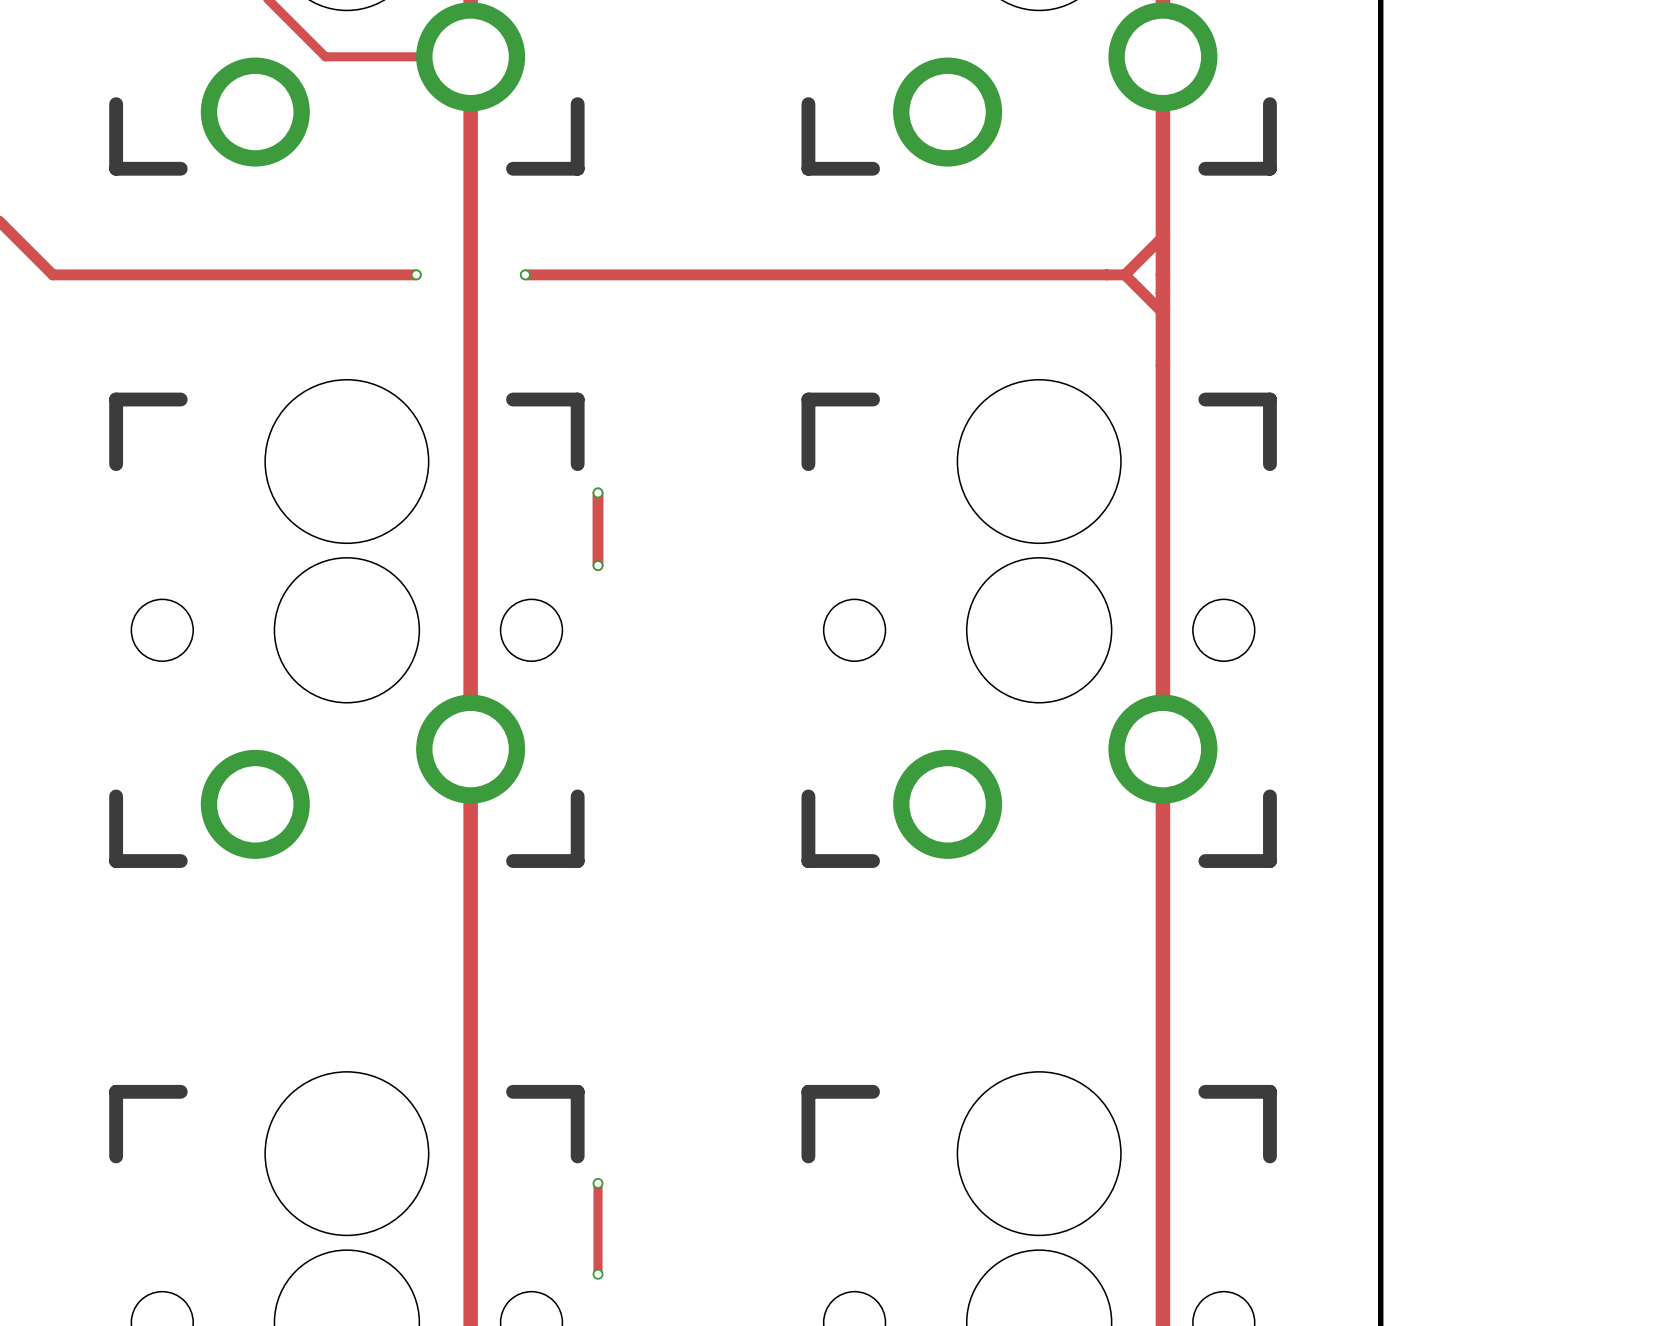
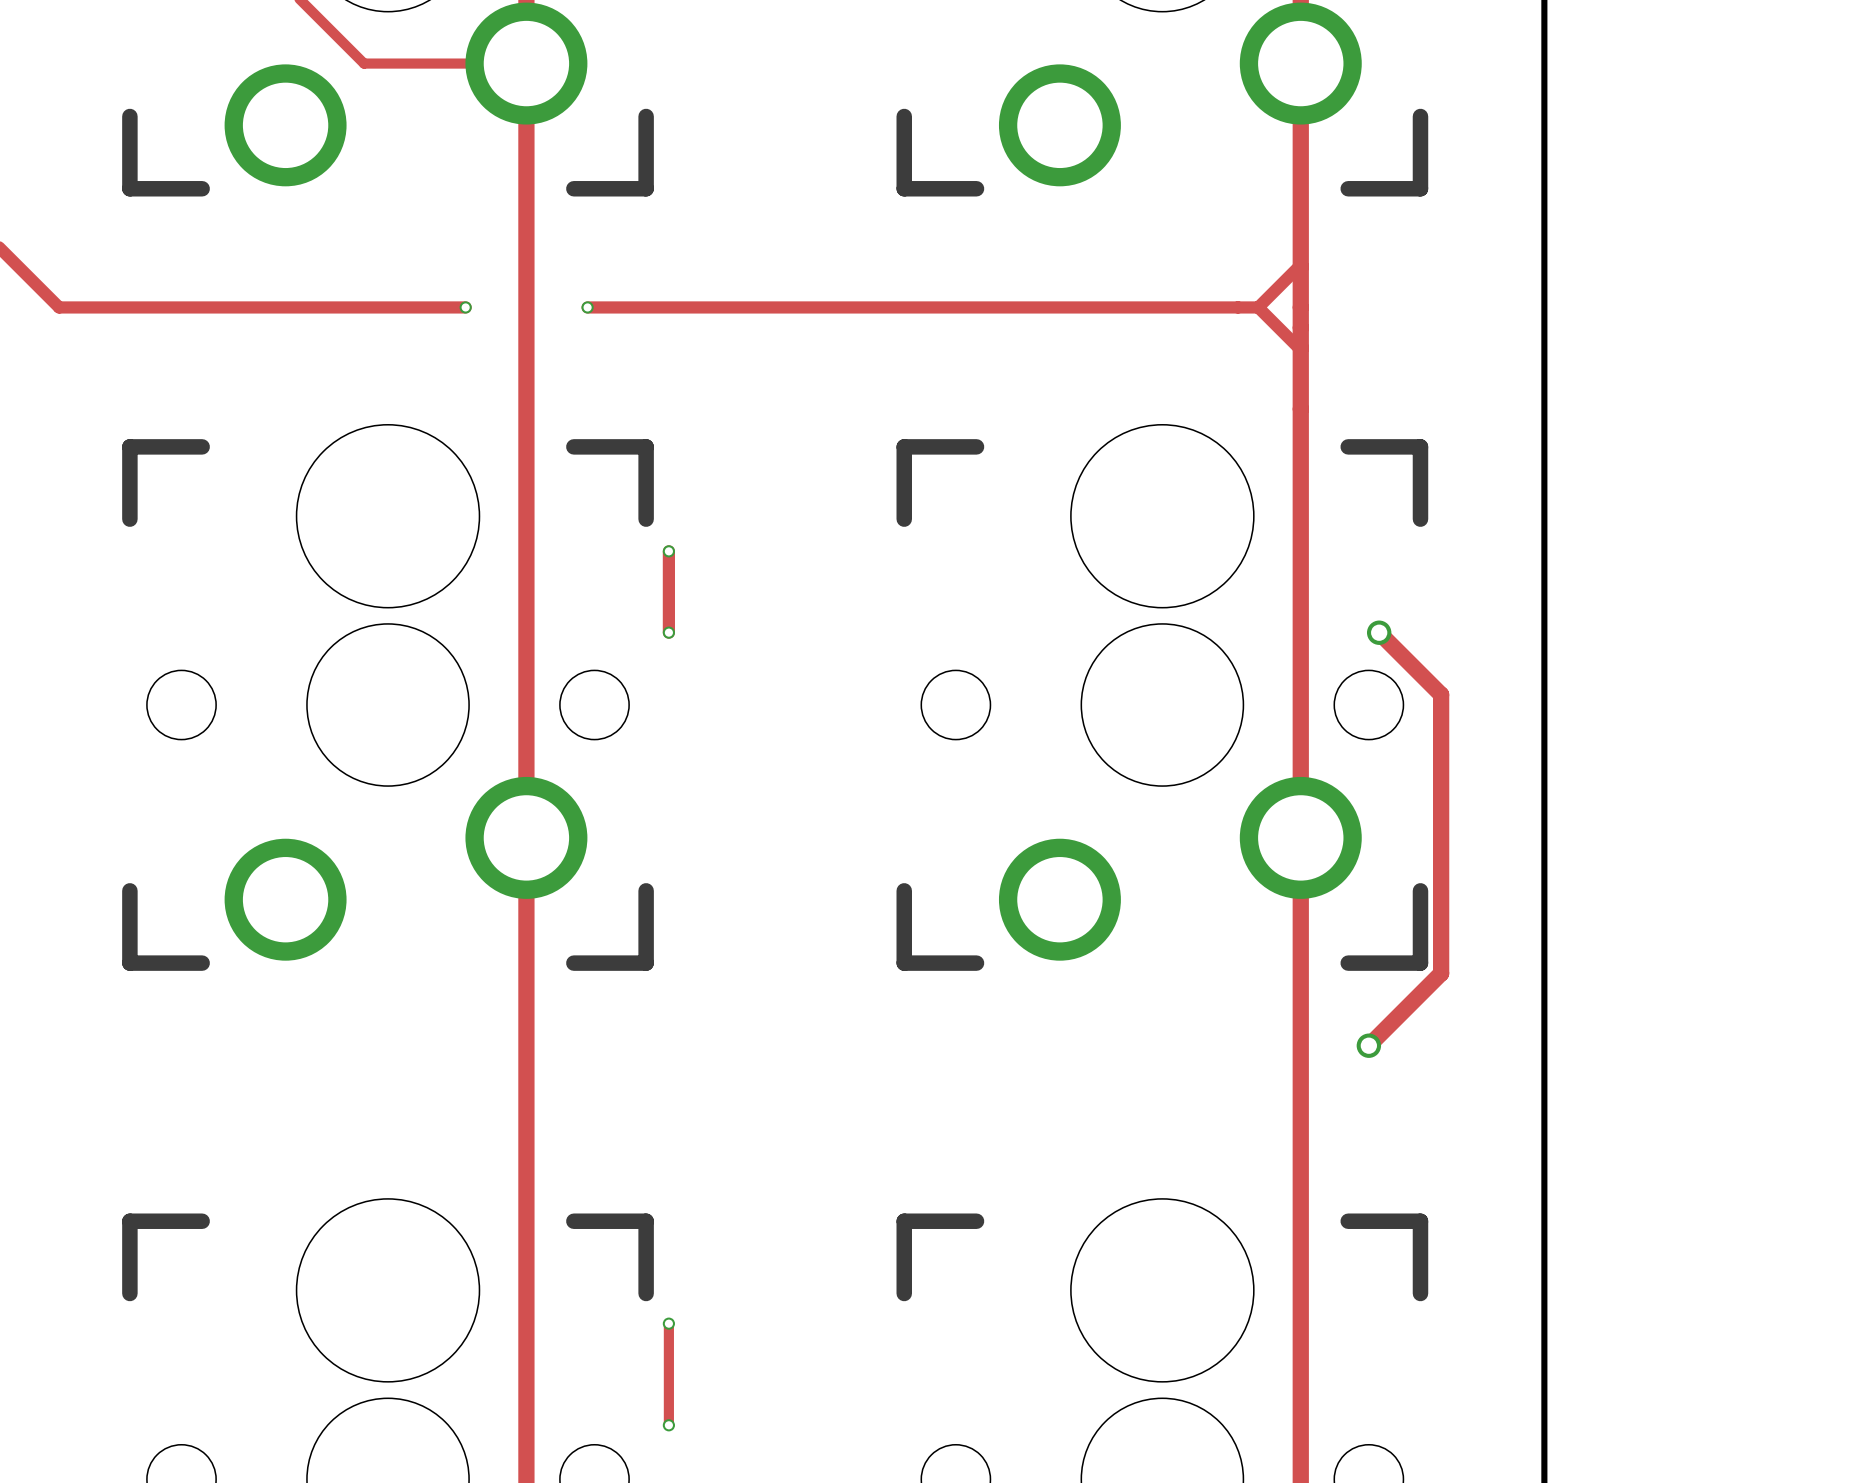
track: none -> (1379, 632) (1441, 694) (1441, 973) (1368, 1045)
via: none -> (1379, 632)
via: none -> (1368, 1045)

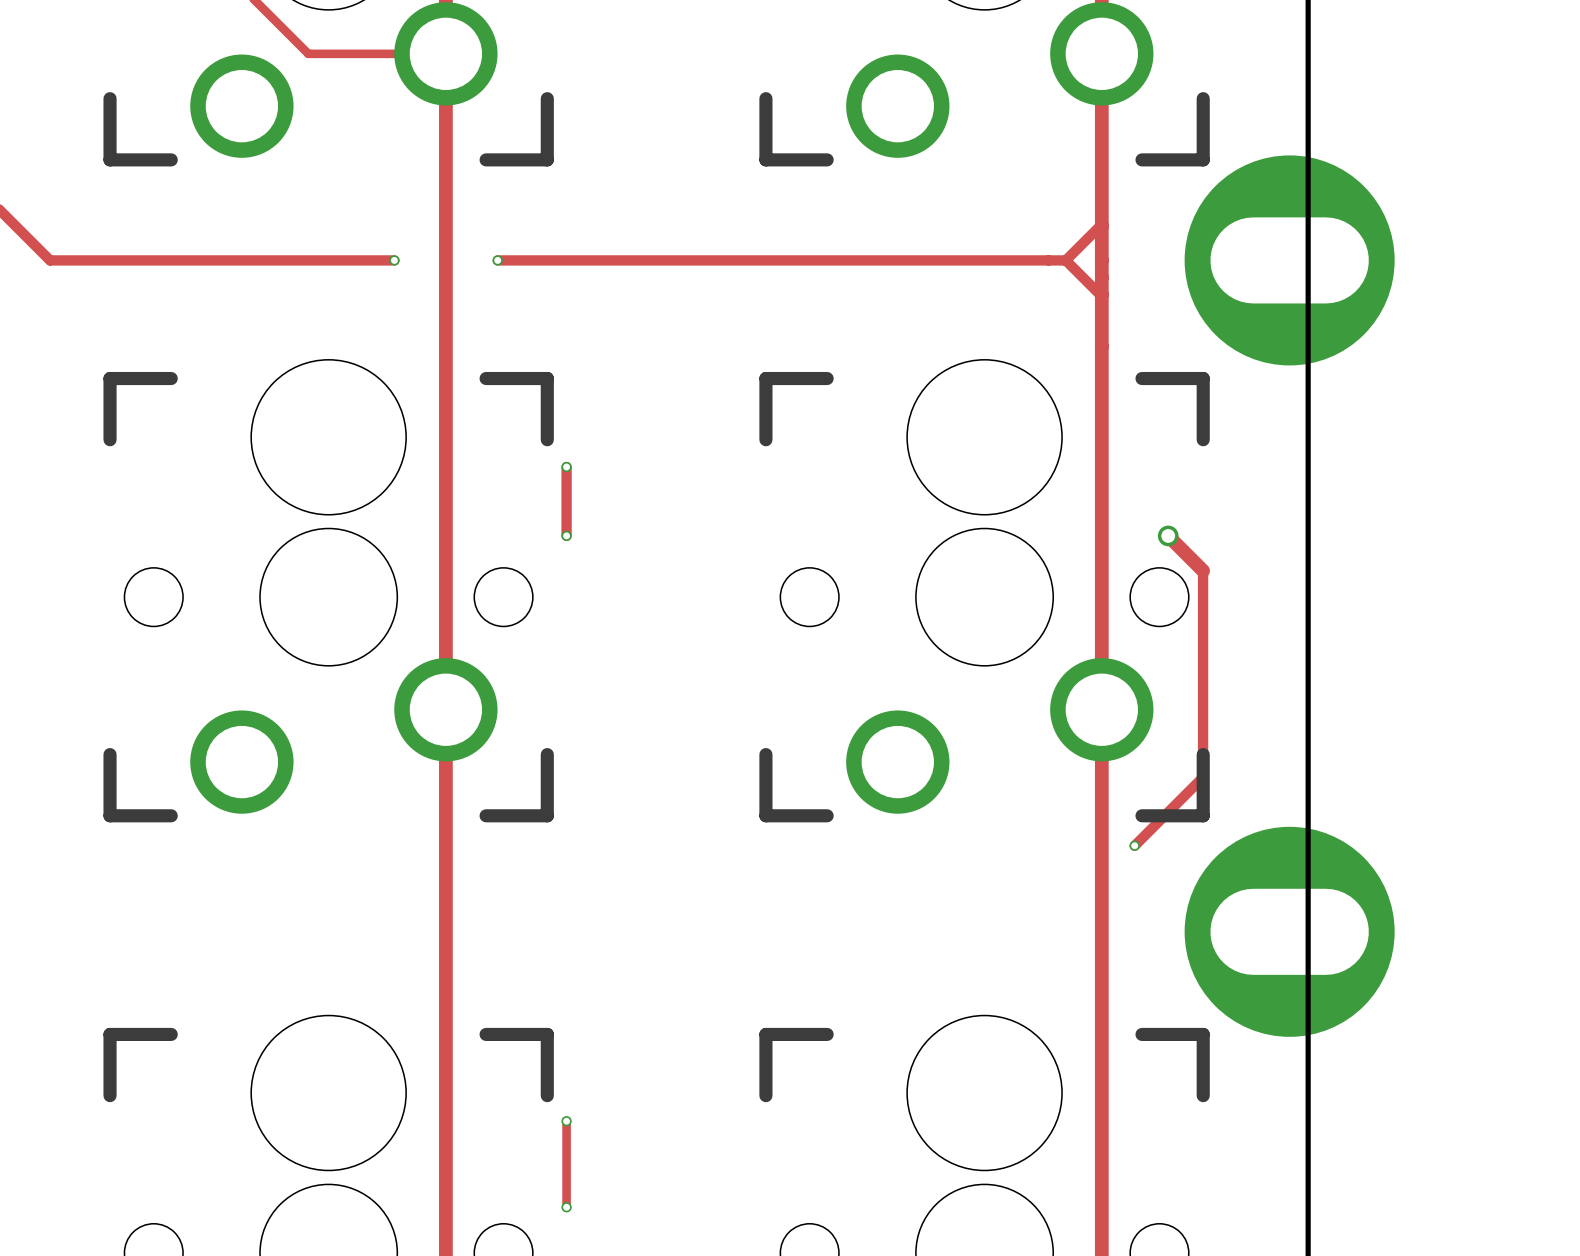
part: none -> (1289, 260)
track: (1420, 673) (1441, 694) (1441, 973) (1368, 1045) -> (1203, 570) (1203, 777) (1134, 845)
via: none -> (1134, 845)
via: (1368, 1045) -> none
part: none -> (1289, 931)

